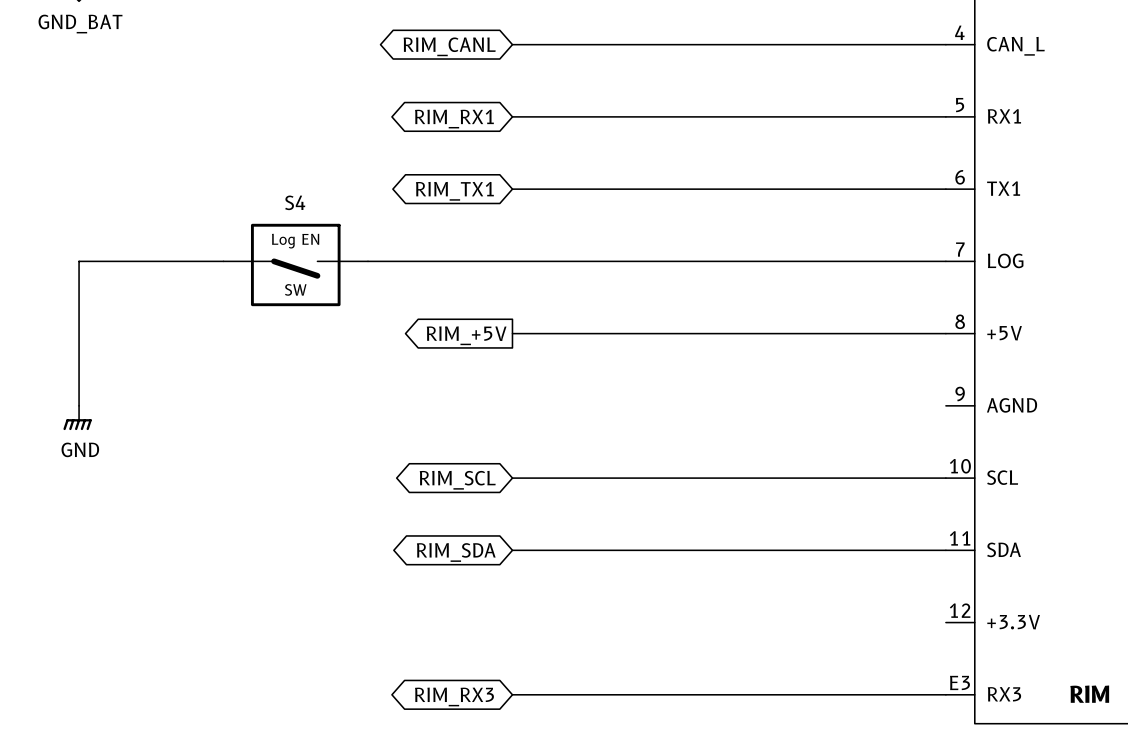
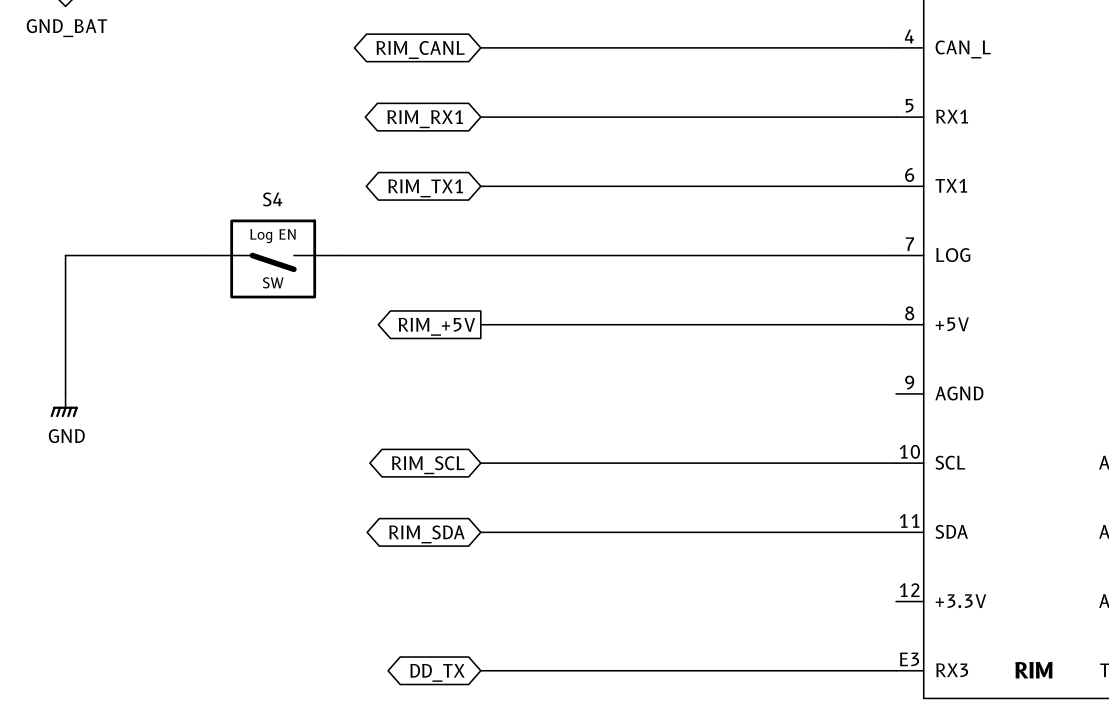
global label: RIM_RX3 (454, 696) -> DD_TX (437, 672)

